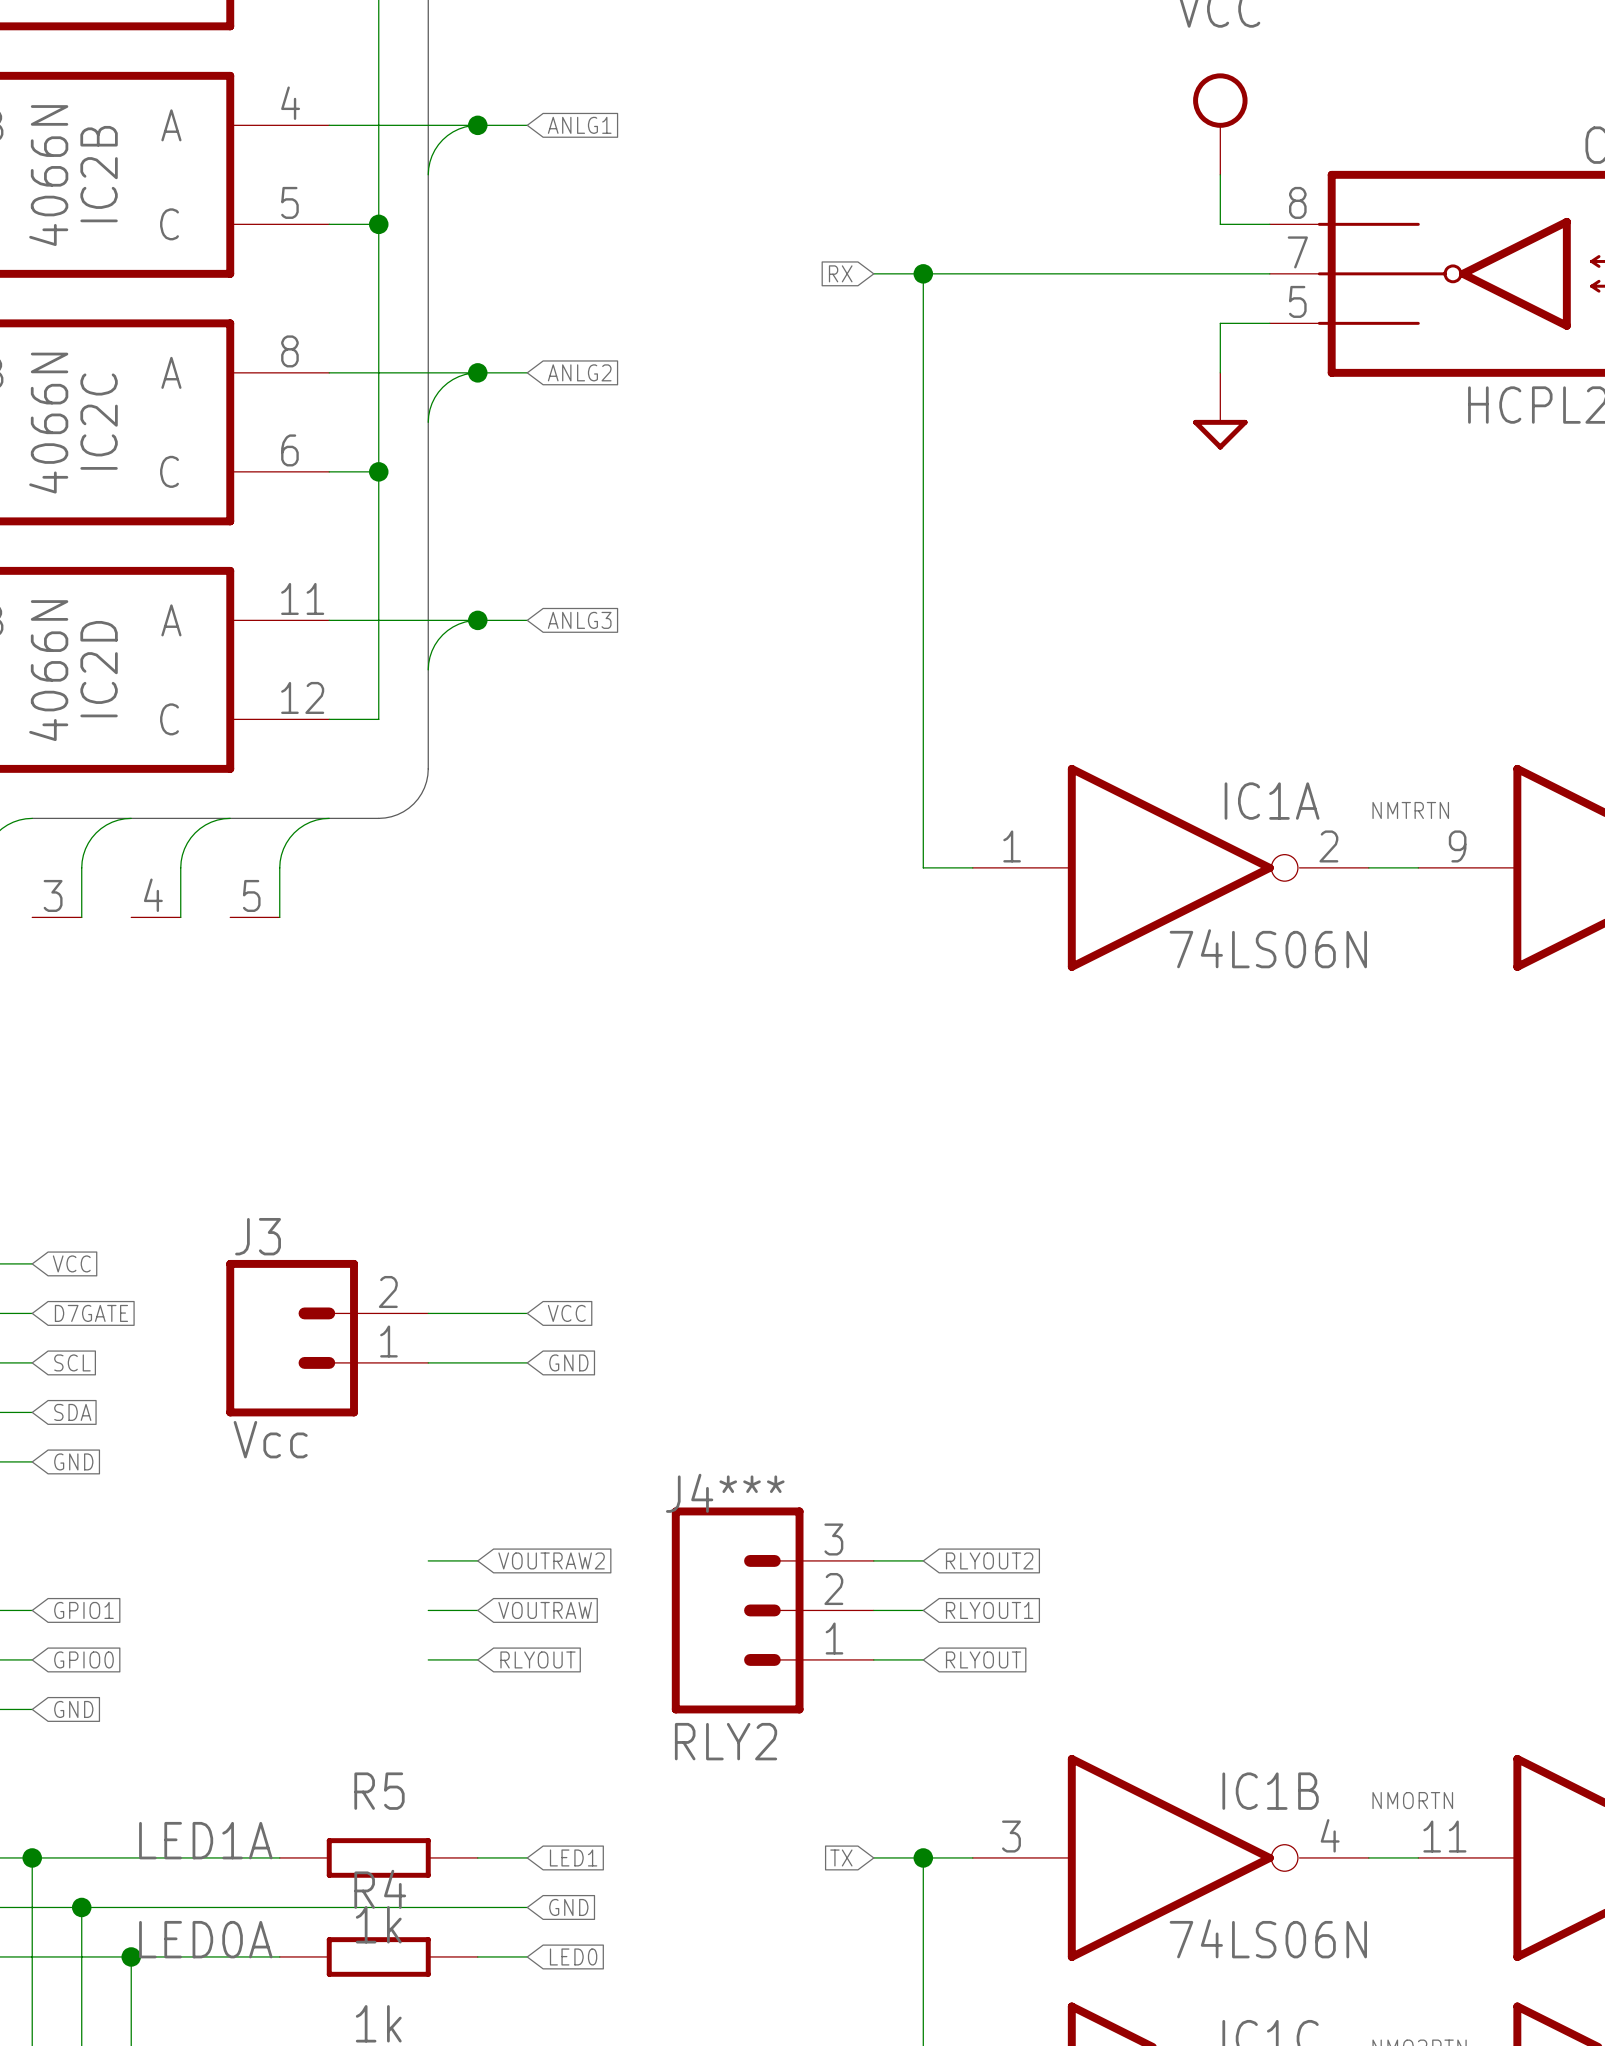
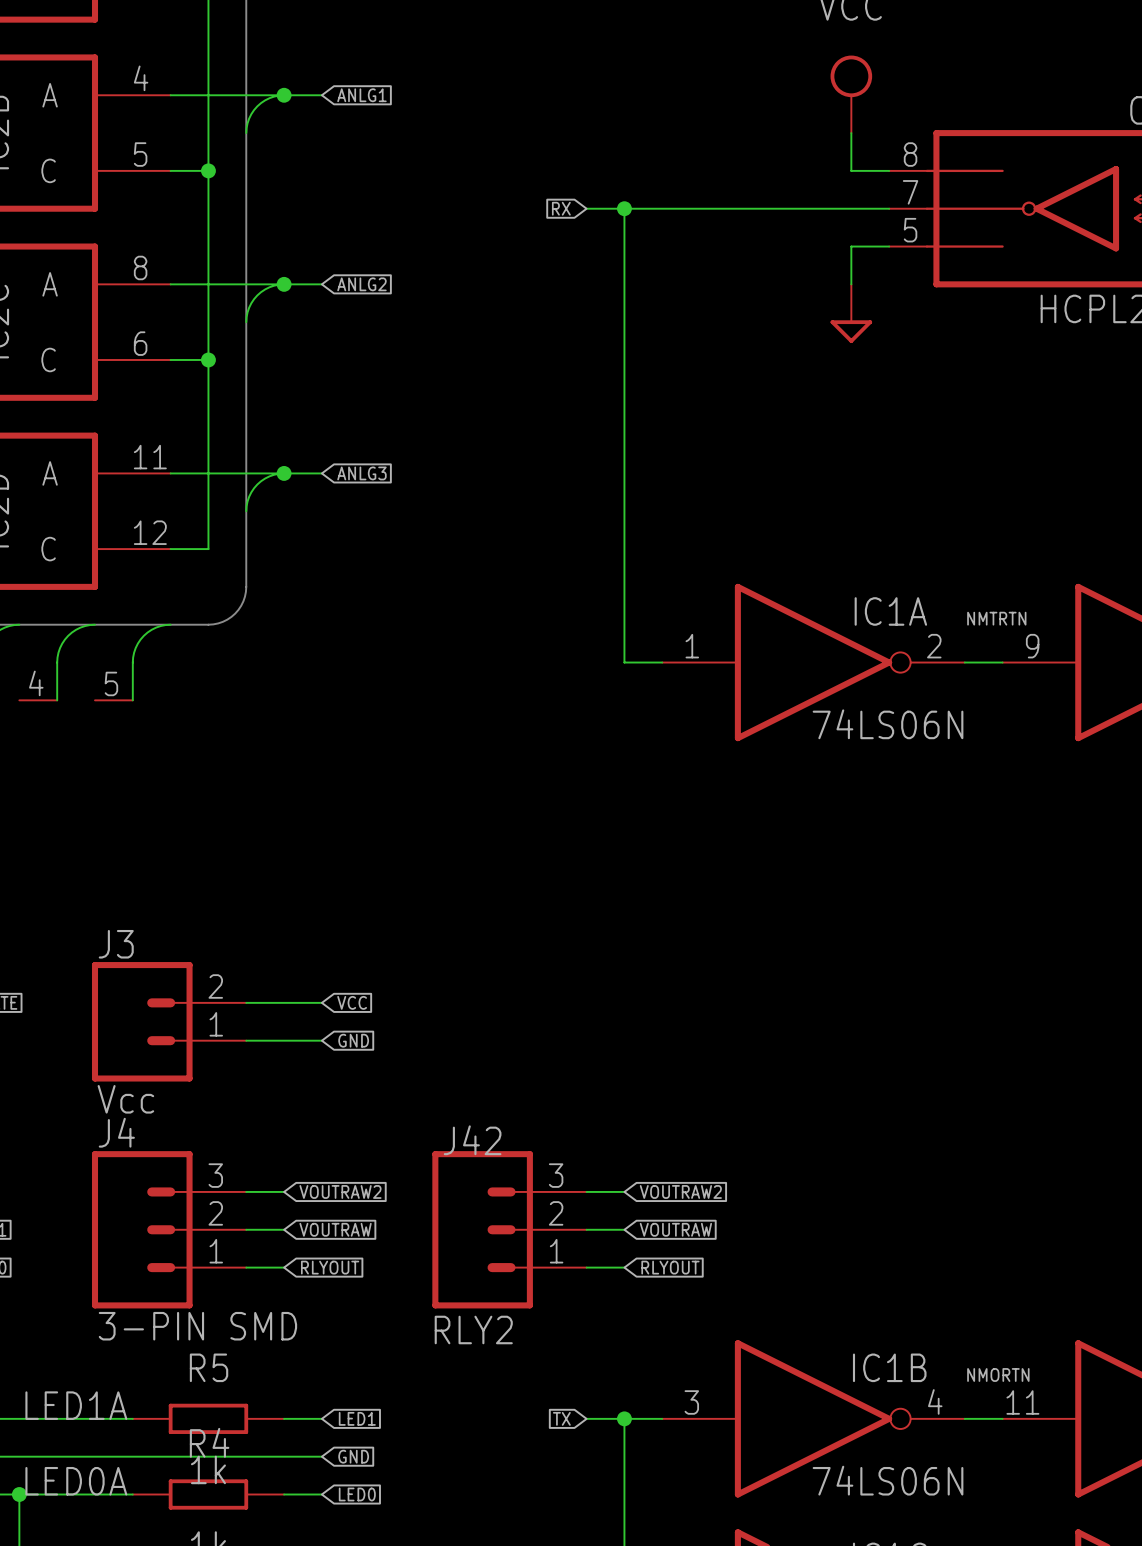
J4*** name: J4*** (725, 1493) -> J42 (472, 1140)
global label: RLYOUT2 (989, 1560) -> VOUTRAW2 (680, 1191)
J4: none -> 3-PIN SMD (169, 1229)
global label: RLYOUT1 (989, 1610) -> VOUTRAW (675, 1229)

